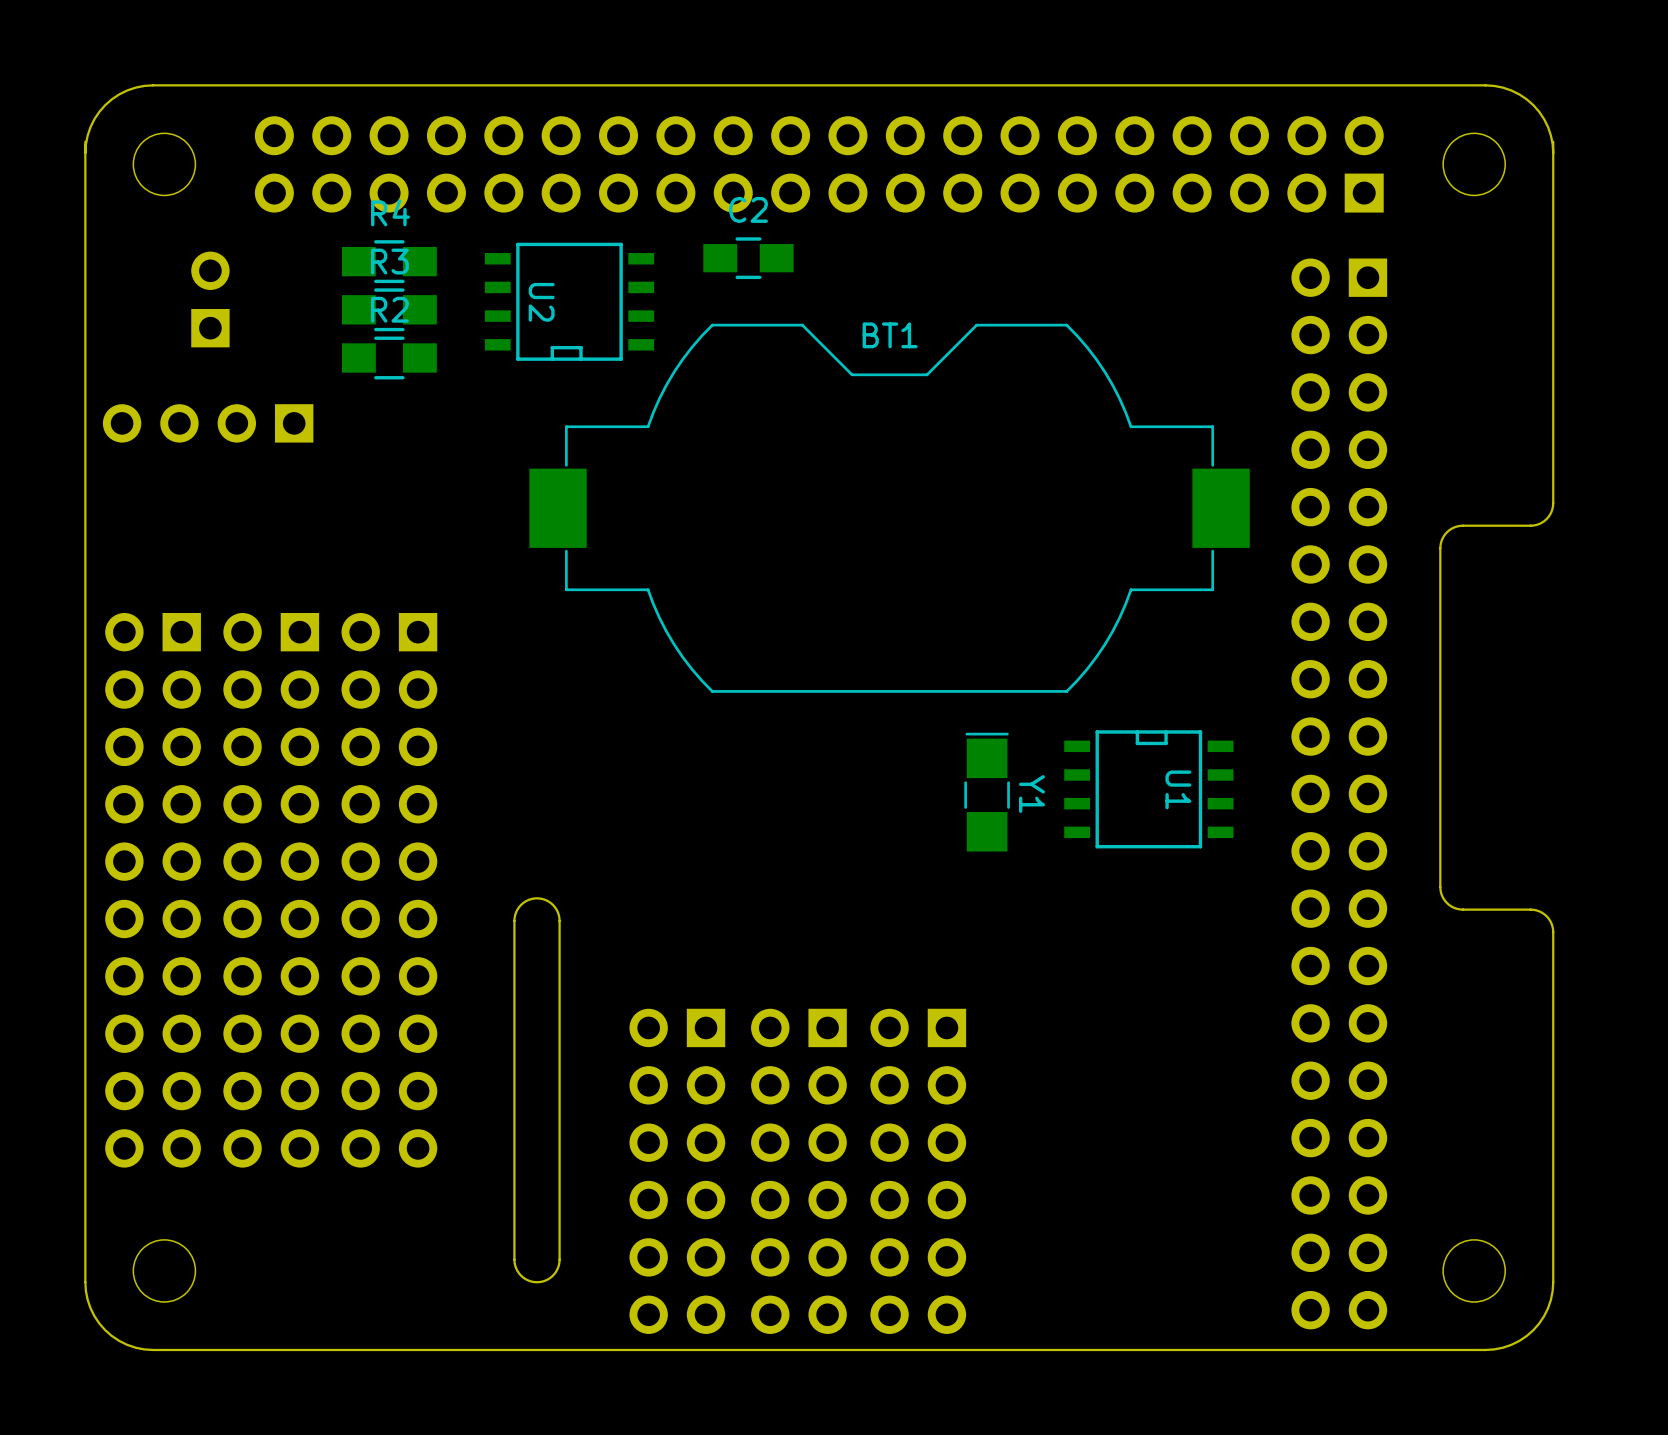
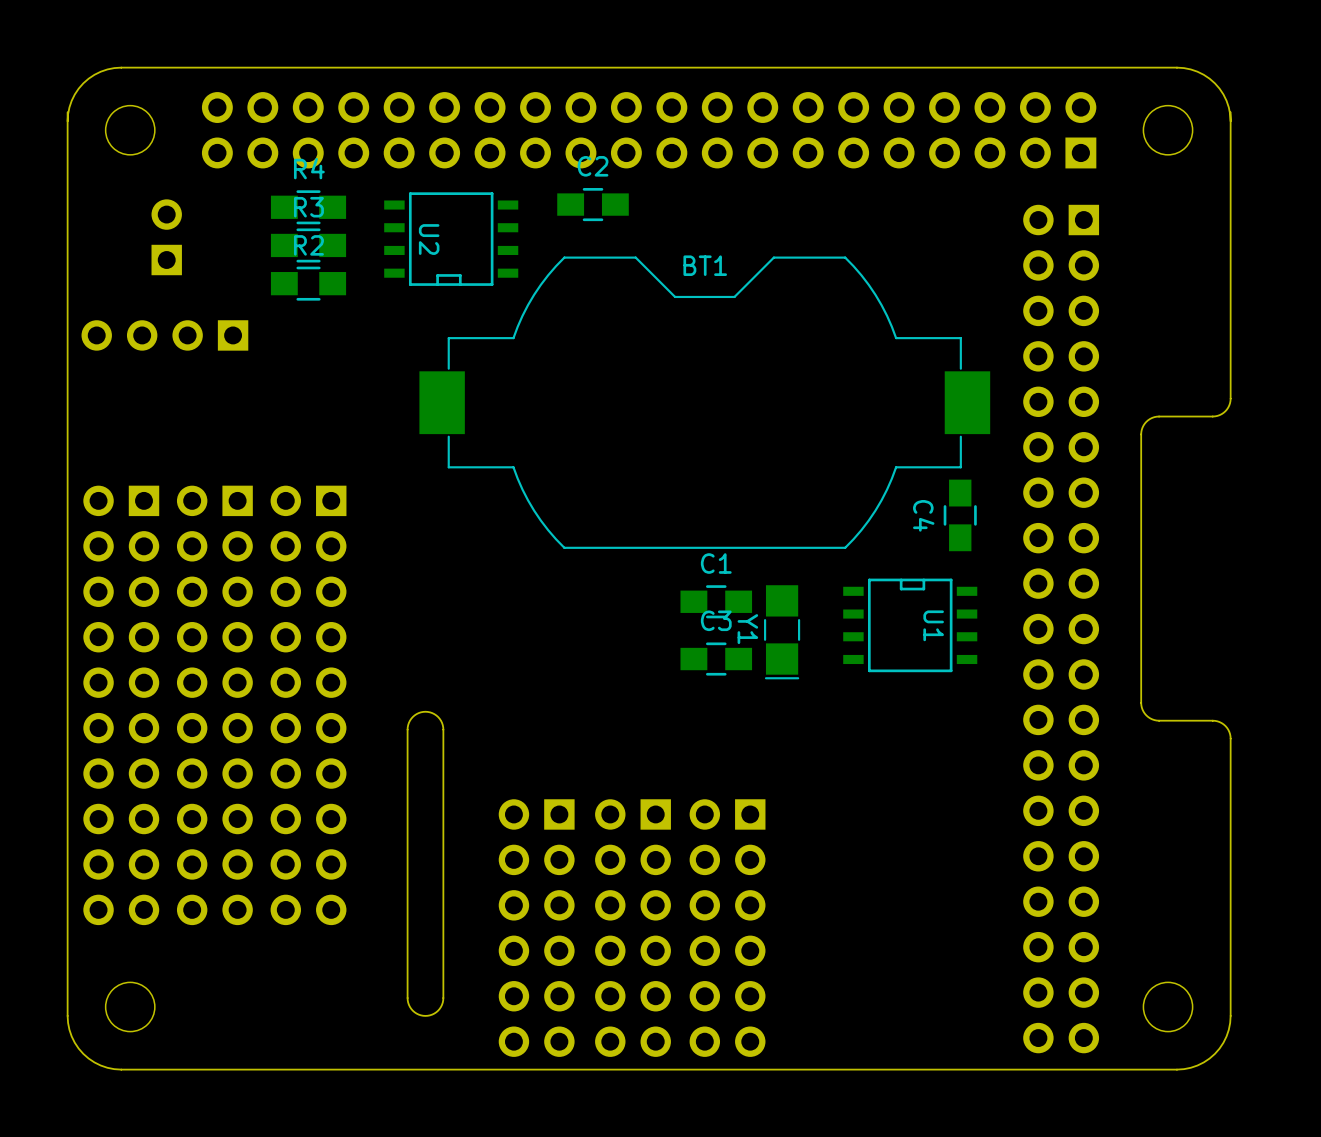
C4: none -> (960, 515)
C1: none -> (716, 601)
Y1 rotation: 0° (987, 792) -> 180° (782, 632)
C3: none -> (716, 659)

